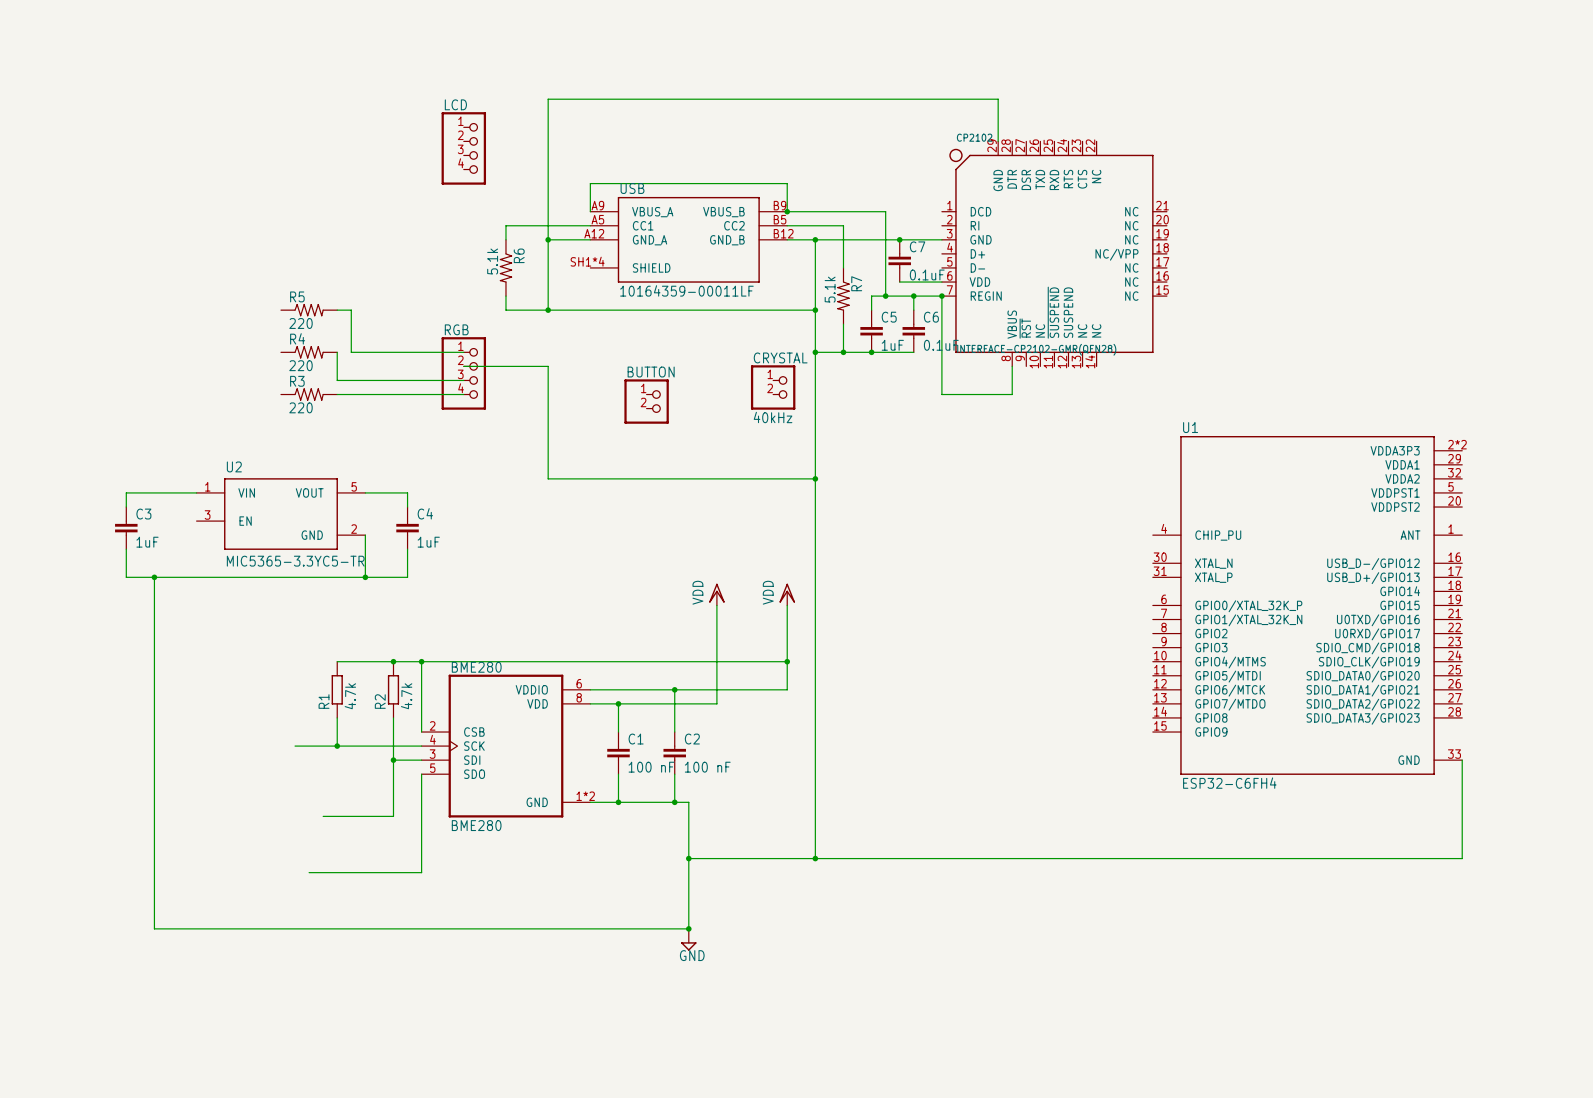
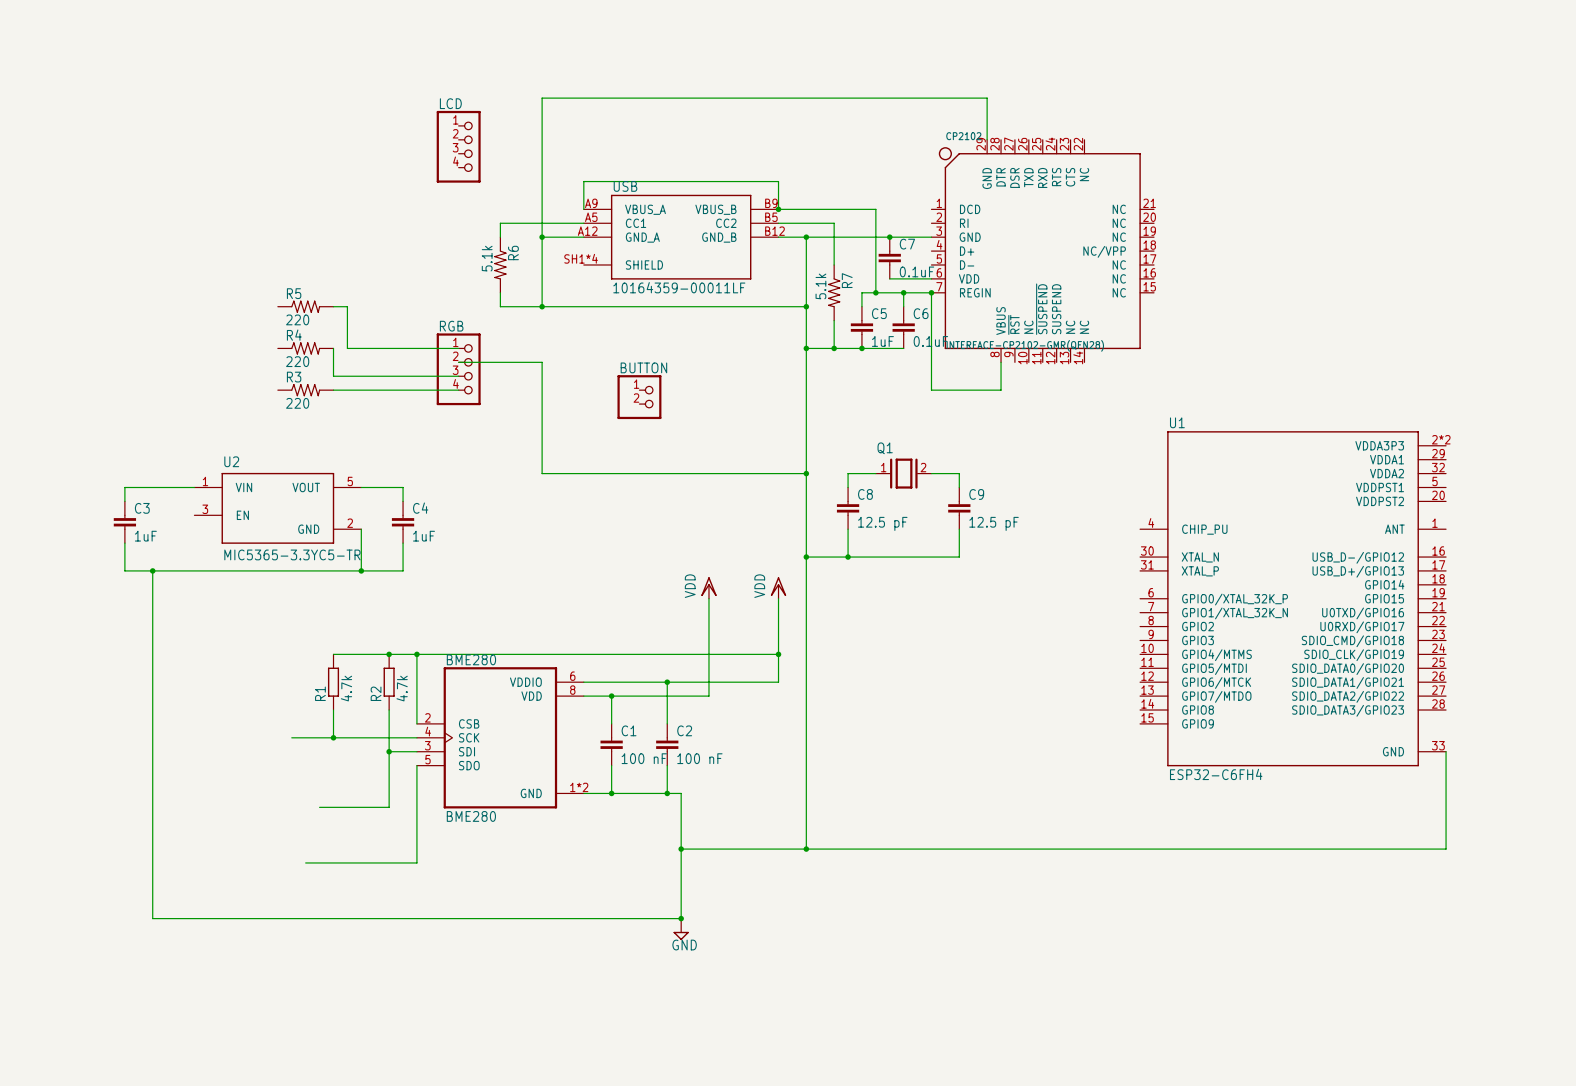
CRYSTAL: 40kHz (773, 387) -> none
wire: none -> (875, 473) (848, 473) (848, 487)
Q1: none -> (903, 473)
wire: none -> (931, 473) (959, 473) (959, 487)
C8: none -> 12.5 pF (848, 508)
C9: none -> 12.5 pF (959, 508)
wire: none -> (848, 529) (848, 557)
wire: none -> (959, 529) (959, 557) (806, 557)
junction: none -> (806, 557)
junction: none -> (848, 557)

